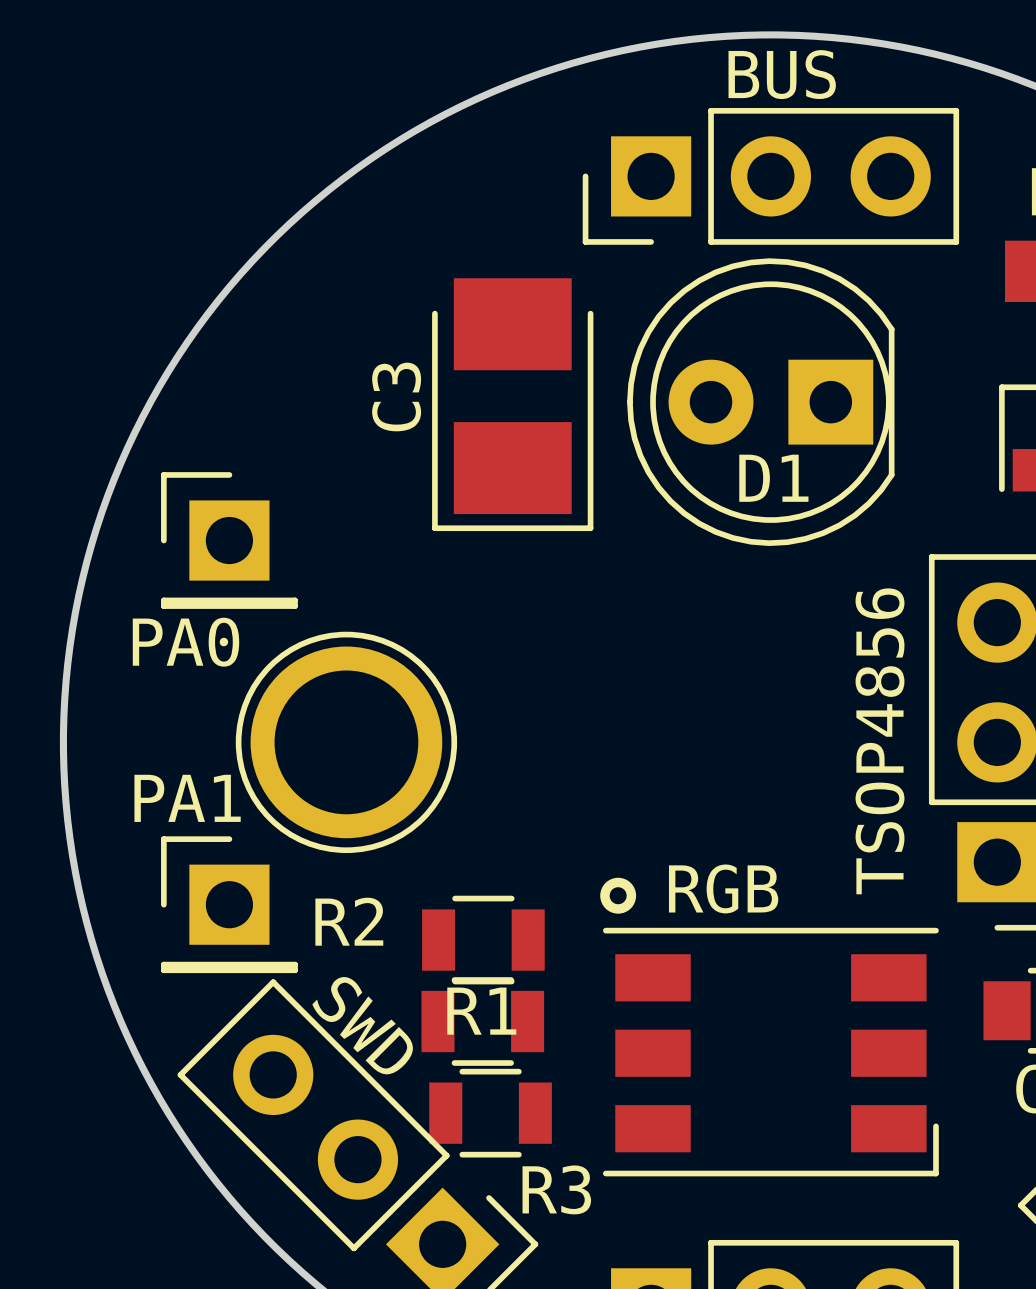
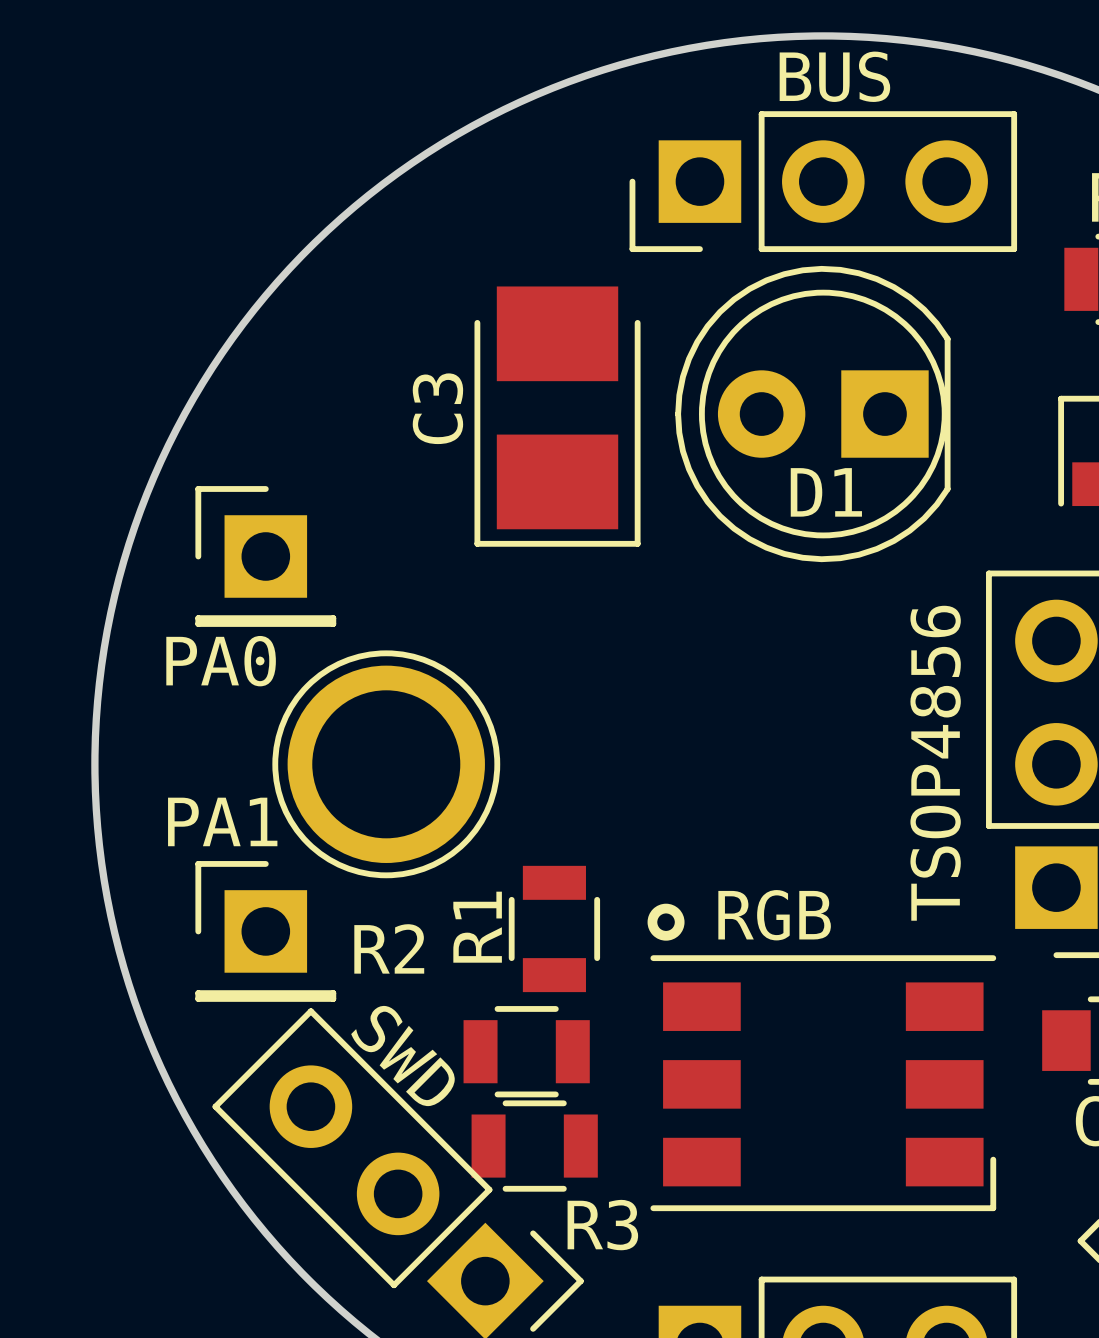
R1 rotation: 0° (483, 940) -> 90° clockwise (554, 928)

